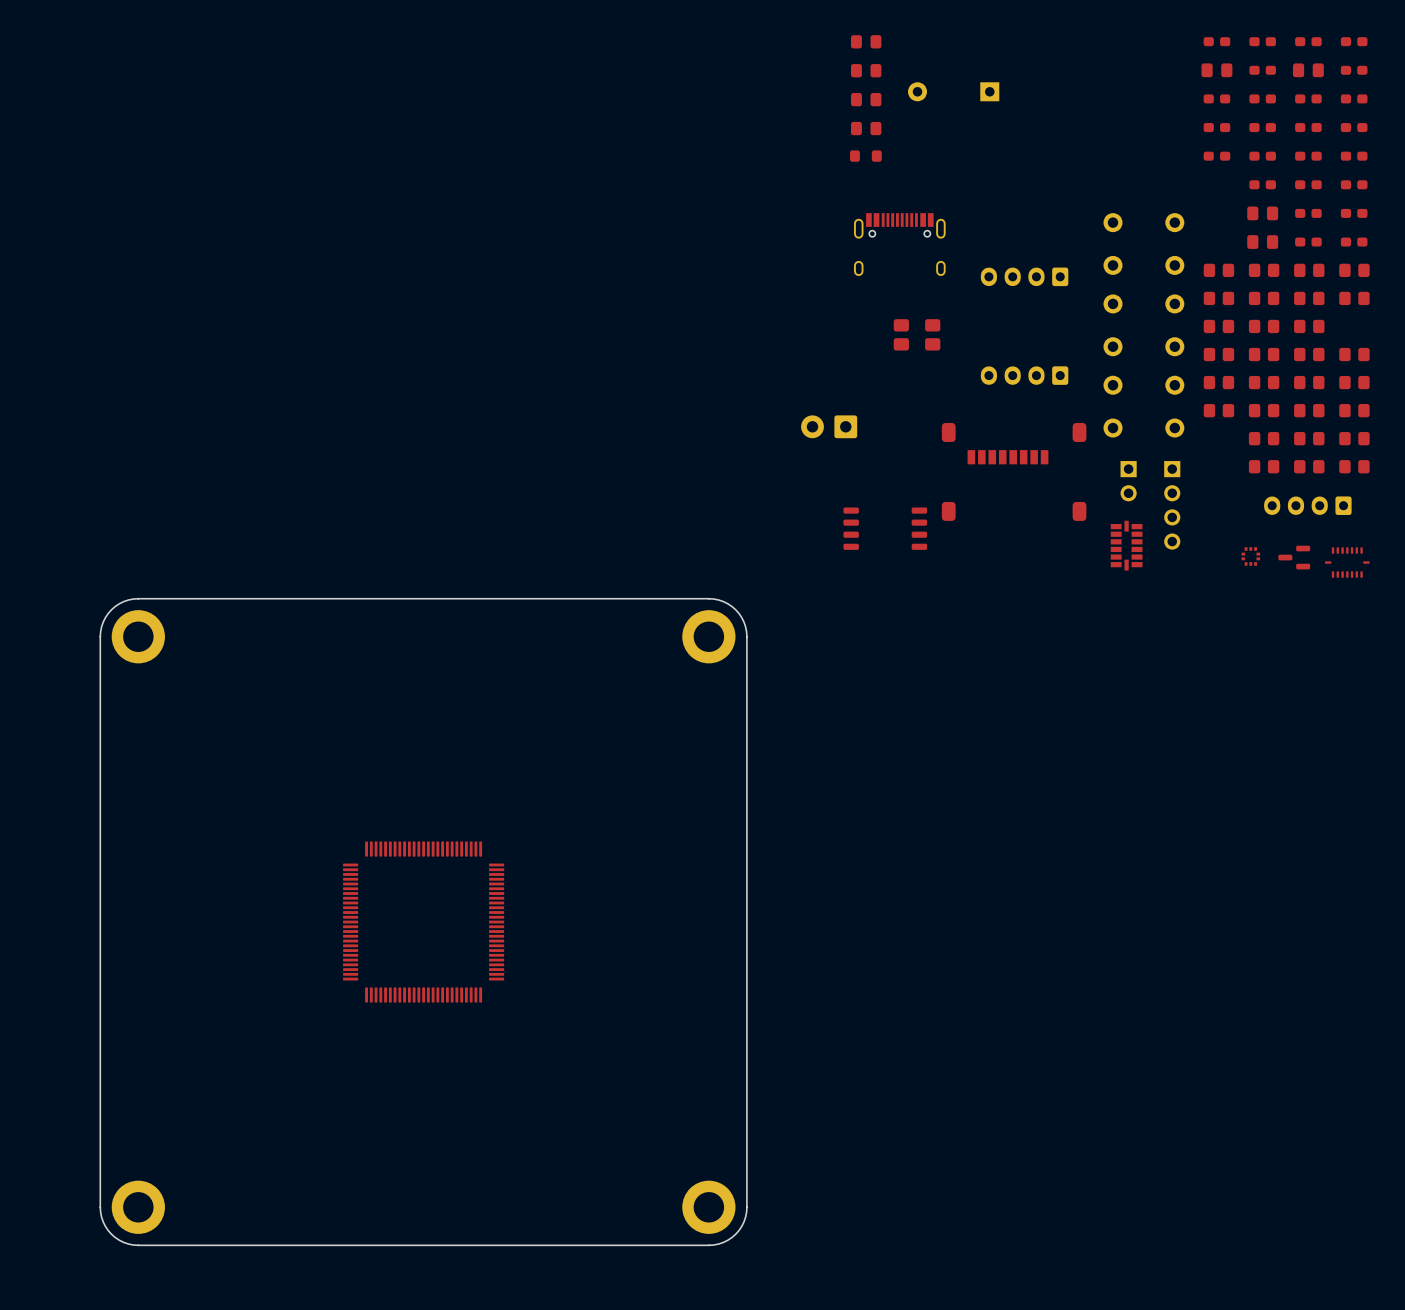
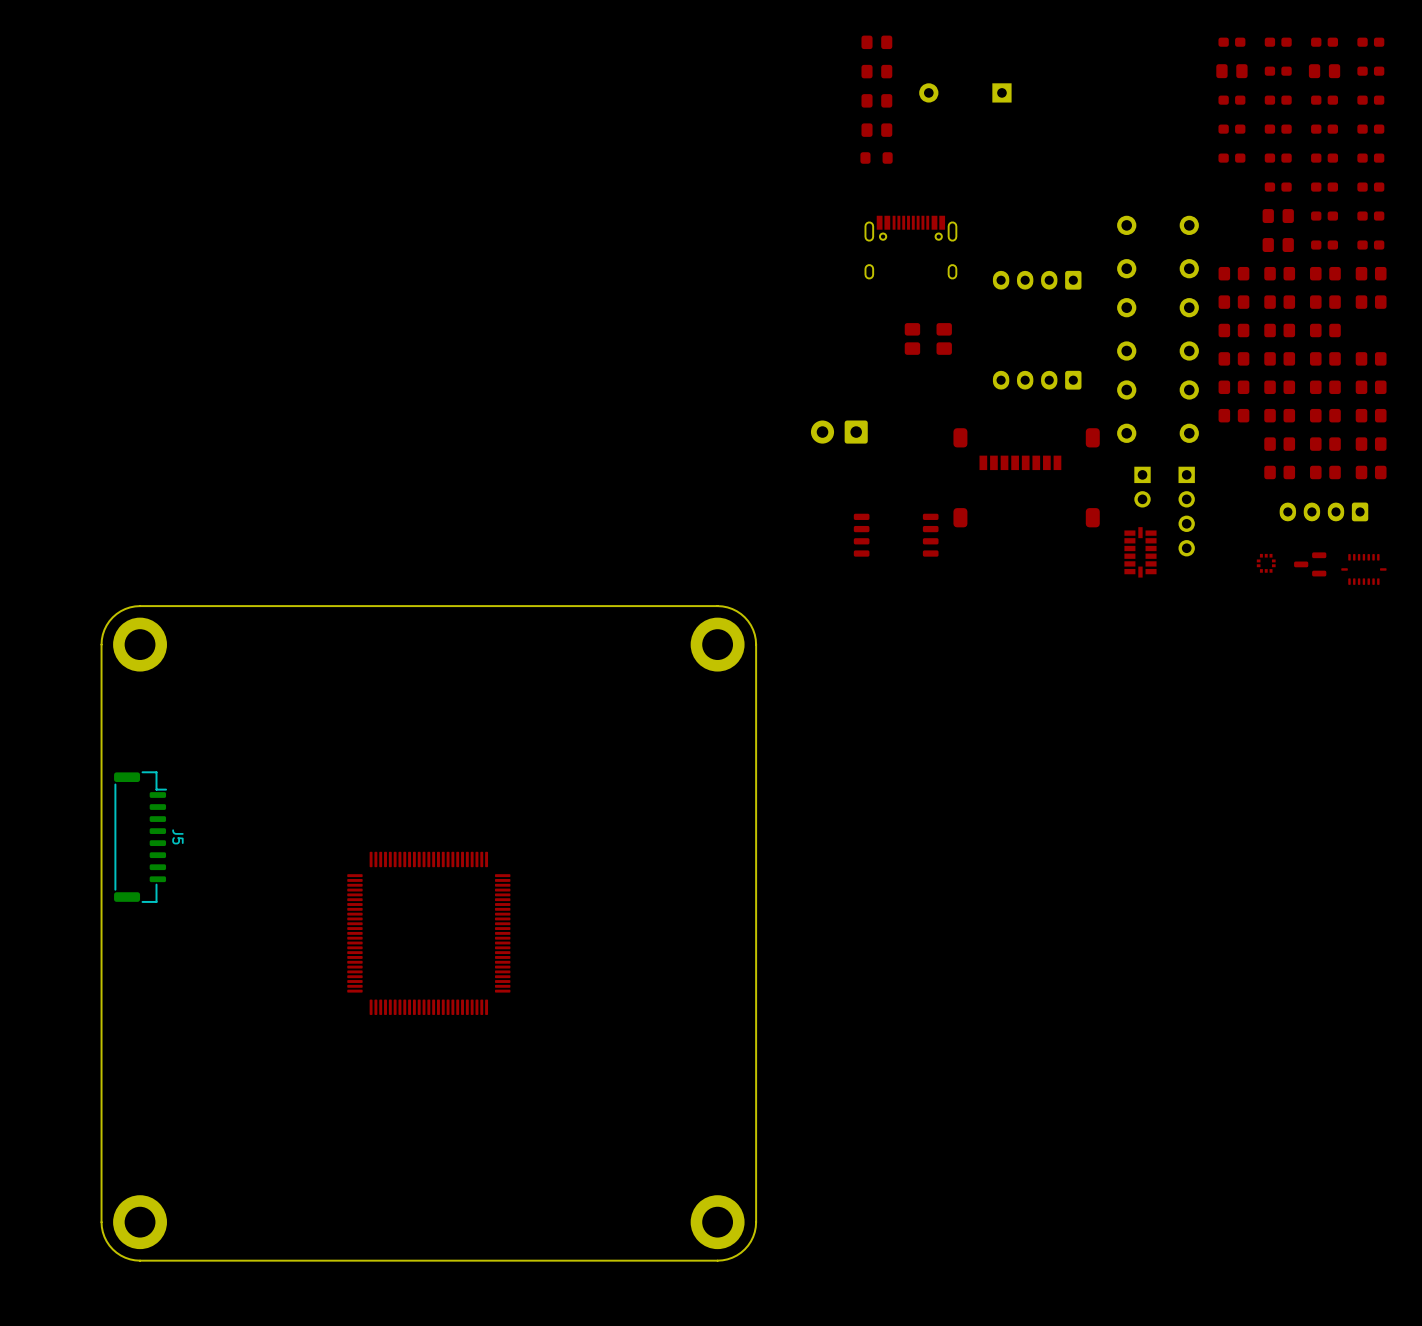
J5: none -> (140, 837)

